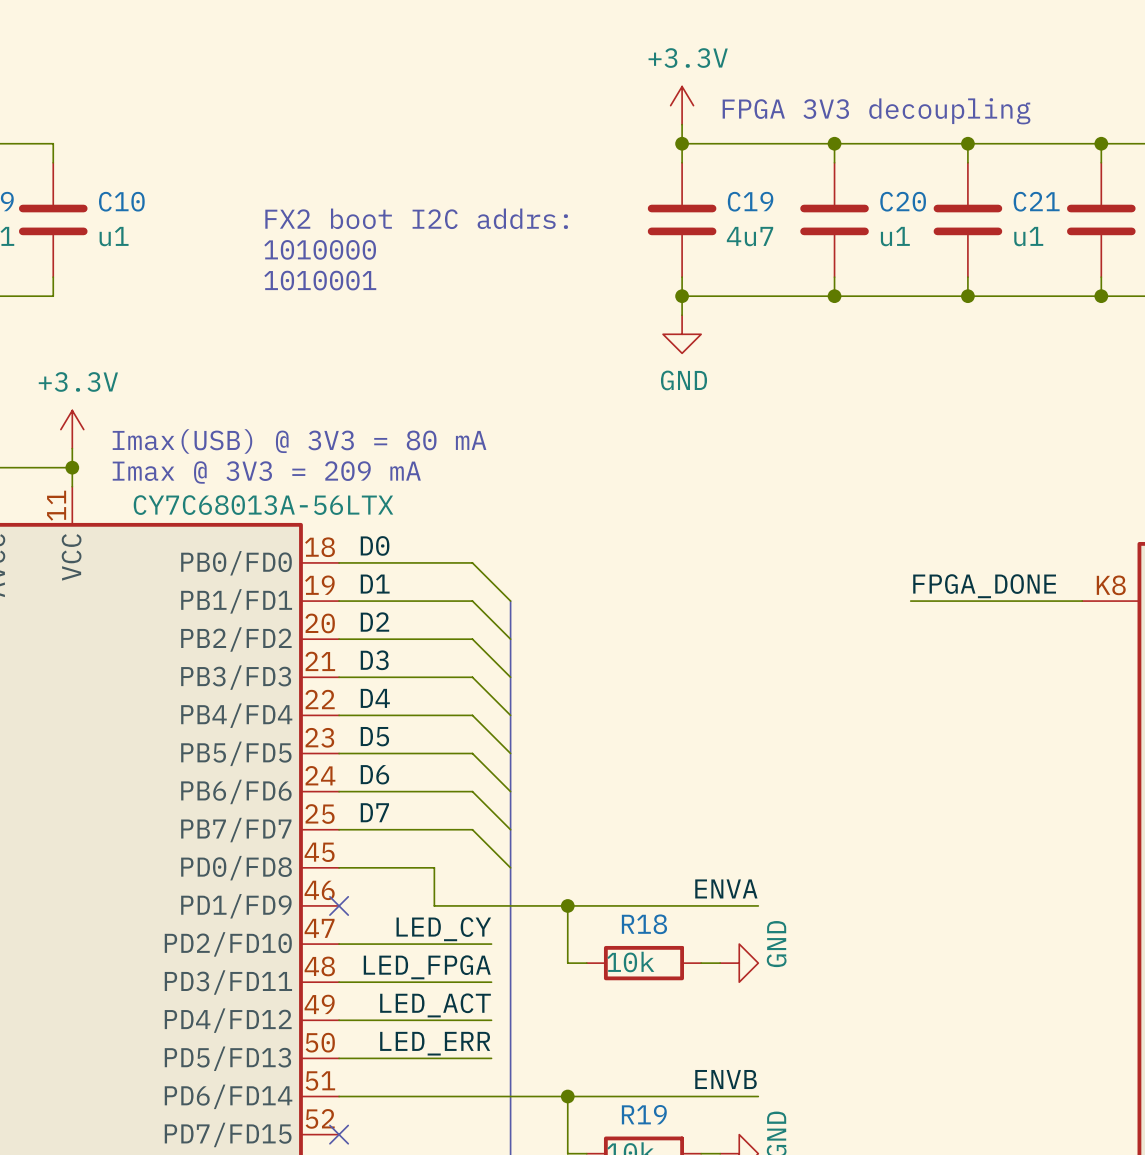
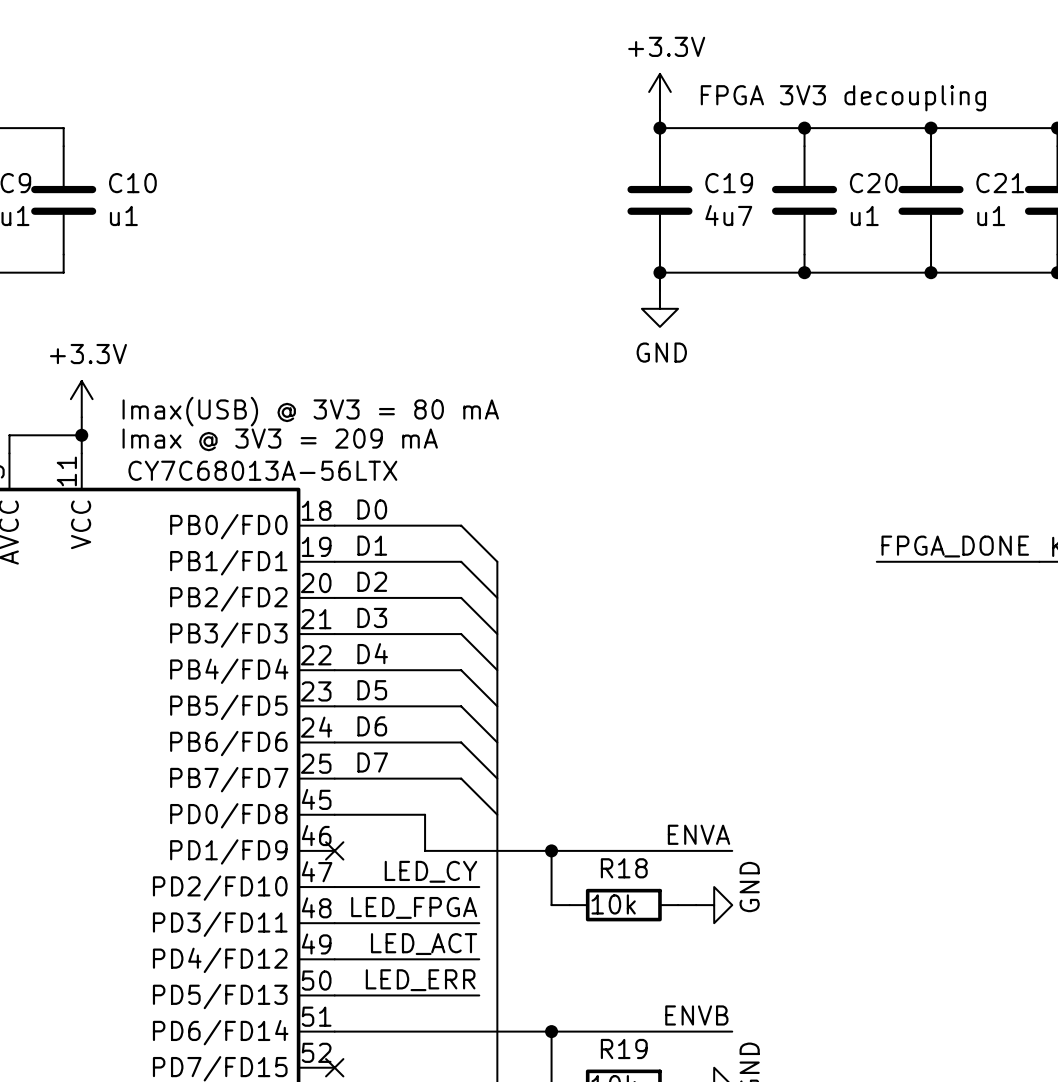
text: FX2 boot I2C addrs: (416, 218) -> none
text: 1010000 (320, 249) -> none
text: 1010001 (320, 280) -> none

